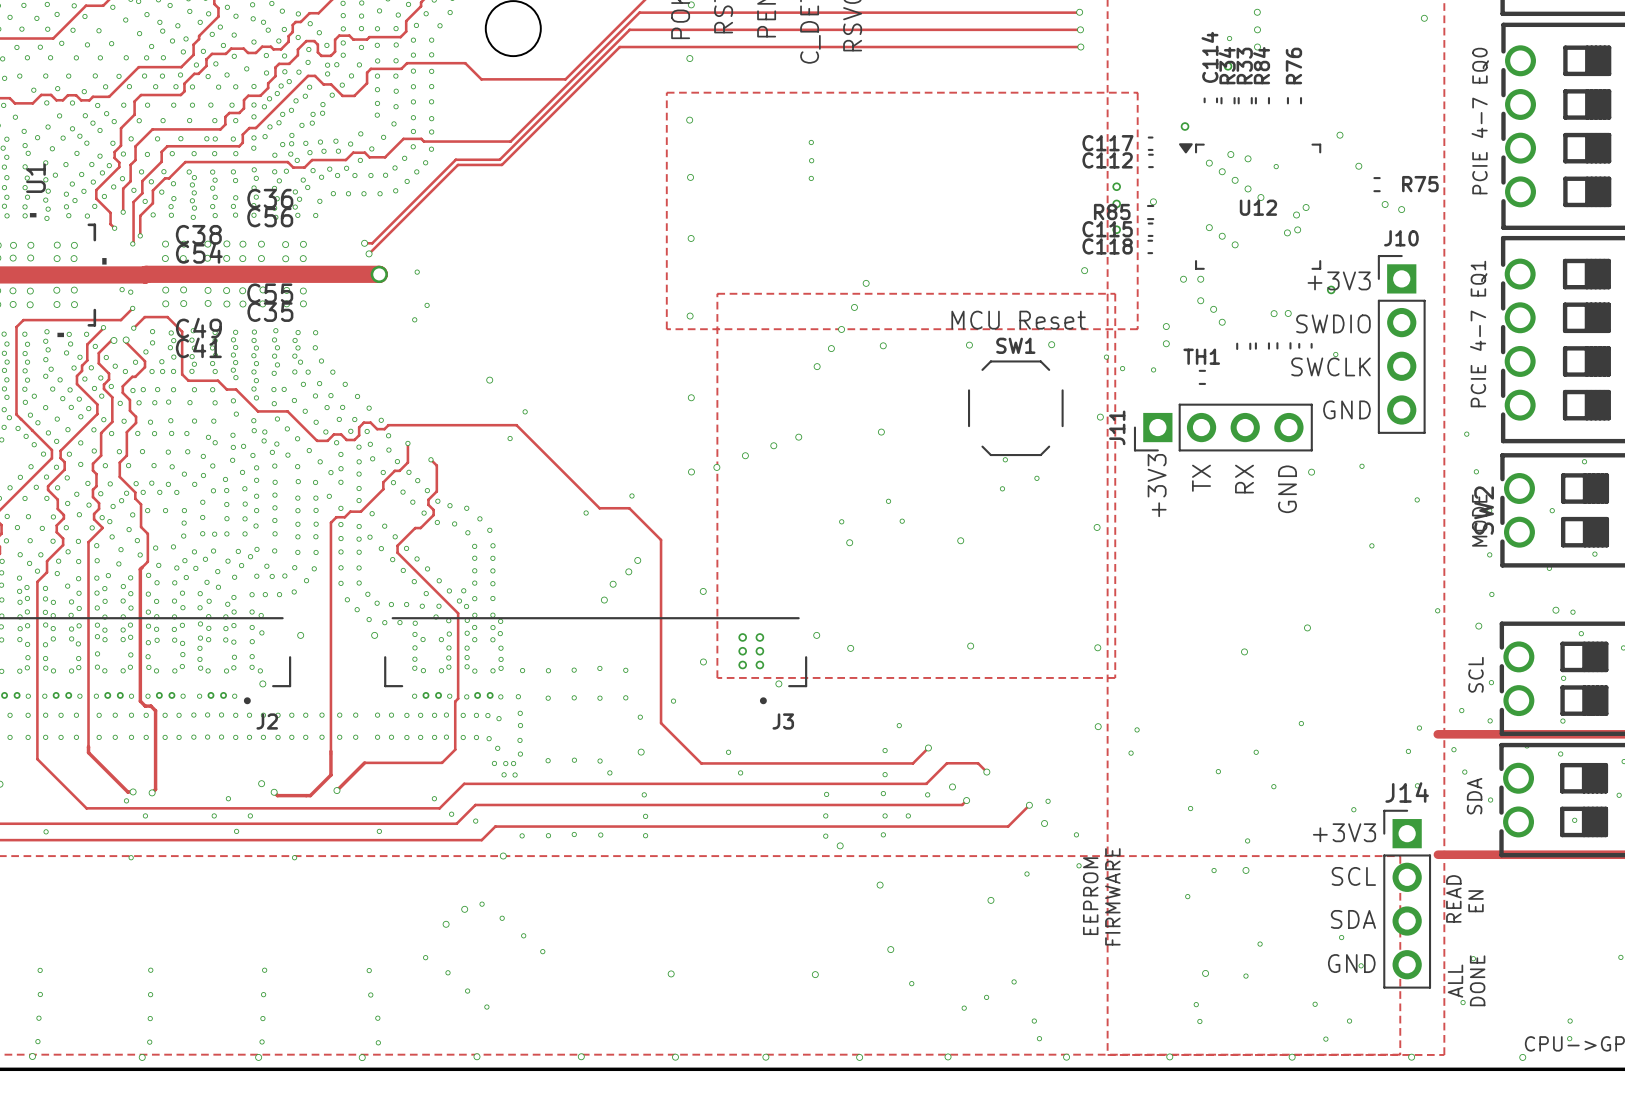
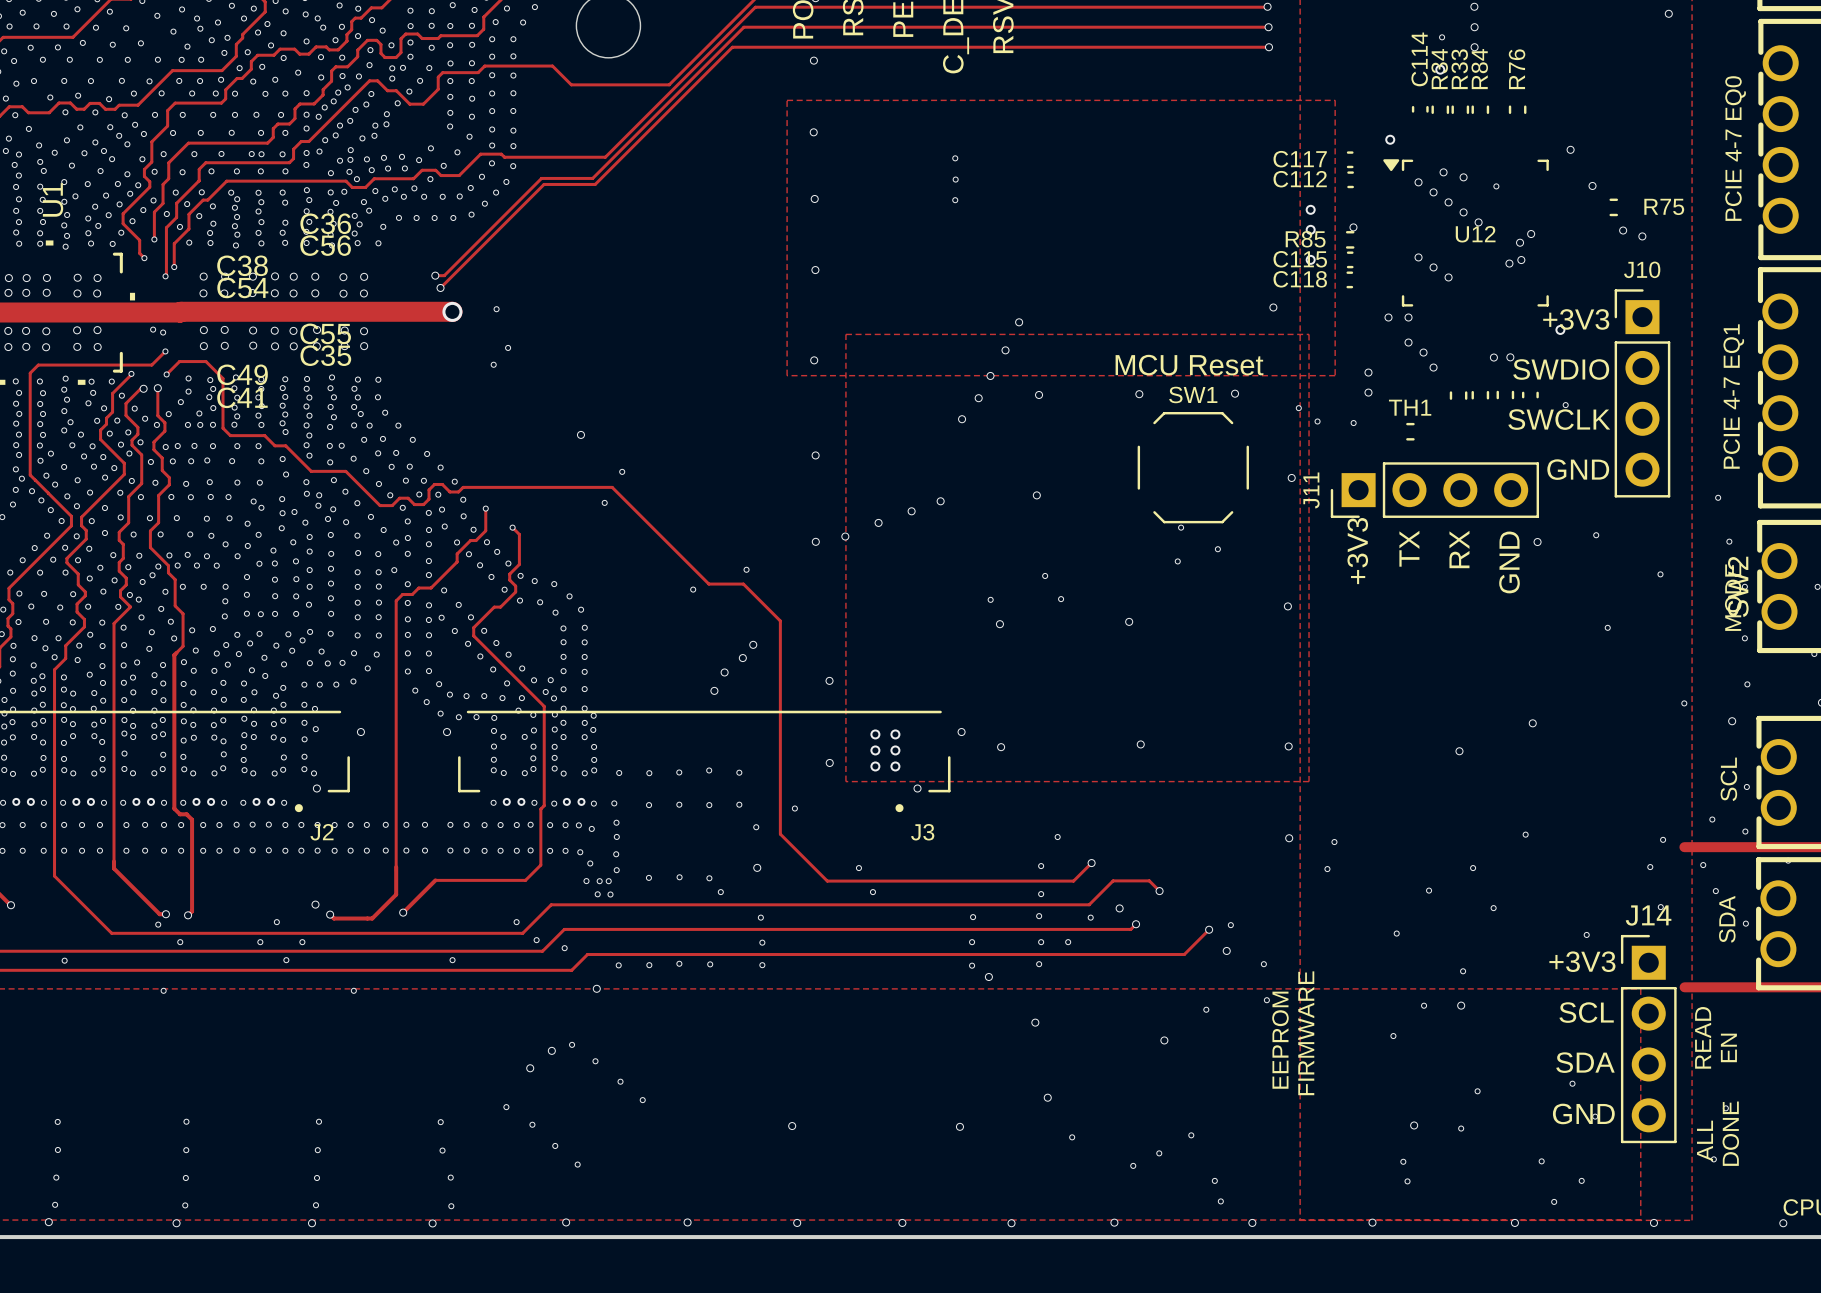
track: (126, 342) (145, 361) (145, 367) (135, 376) (132, 376) -> (157, 391) (157, 415) (164, 422) (164, 431)

